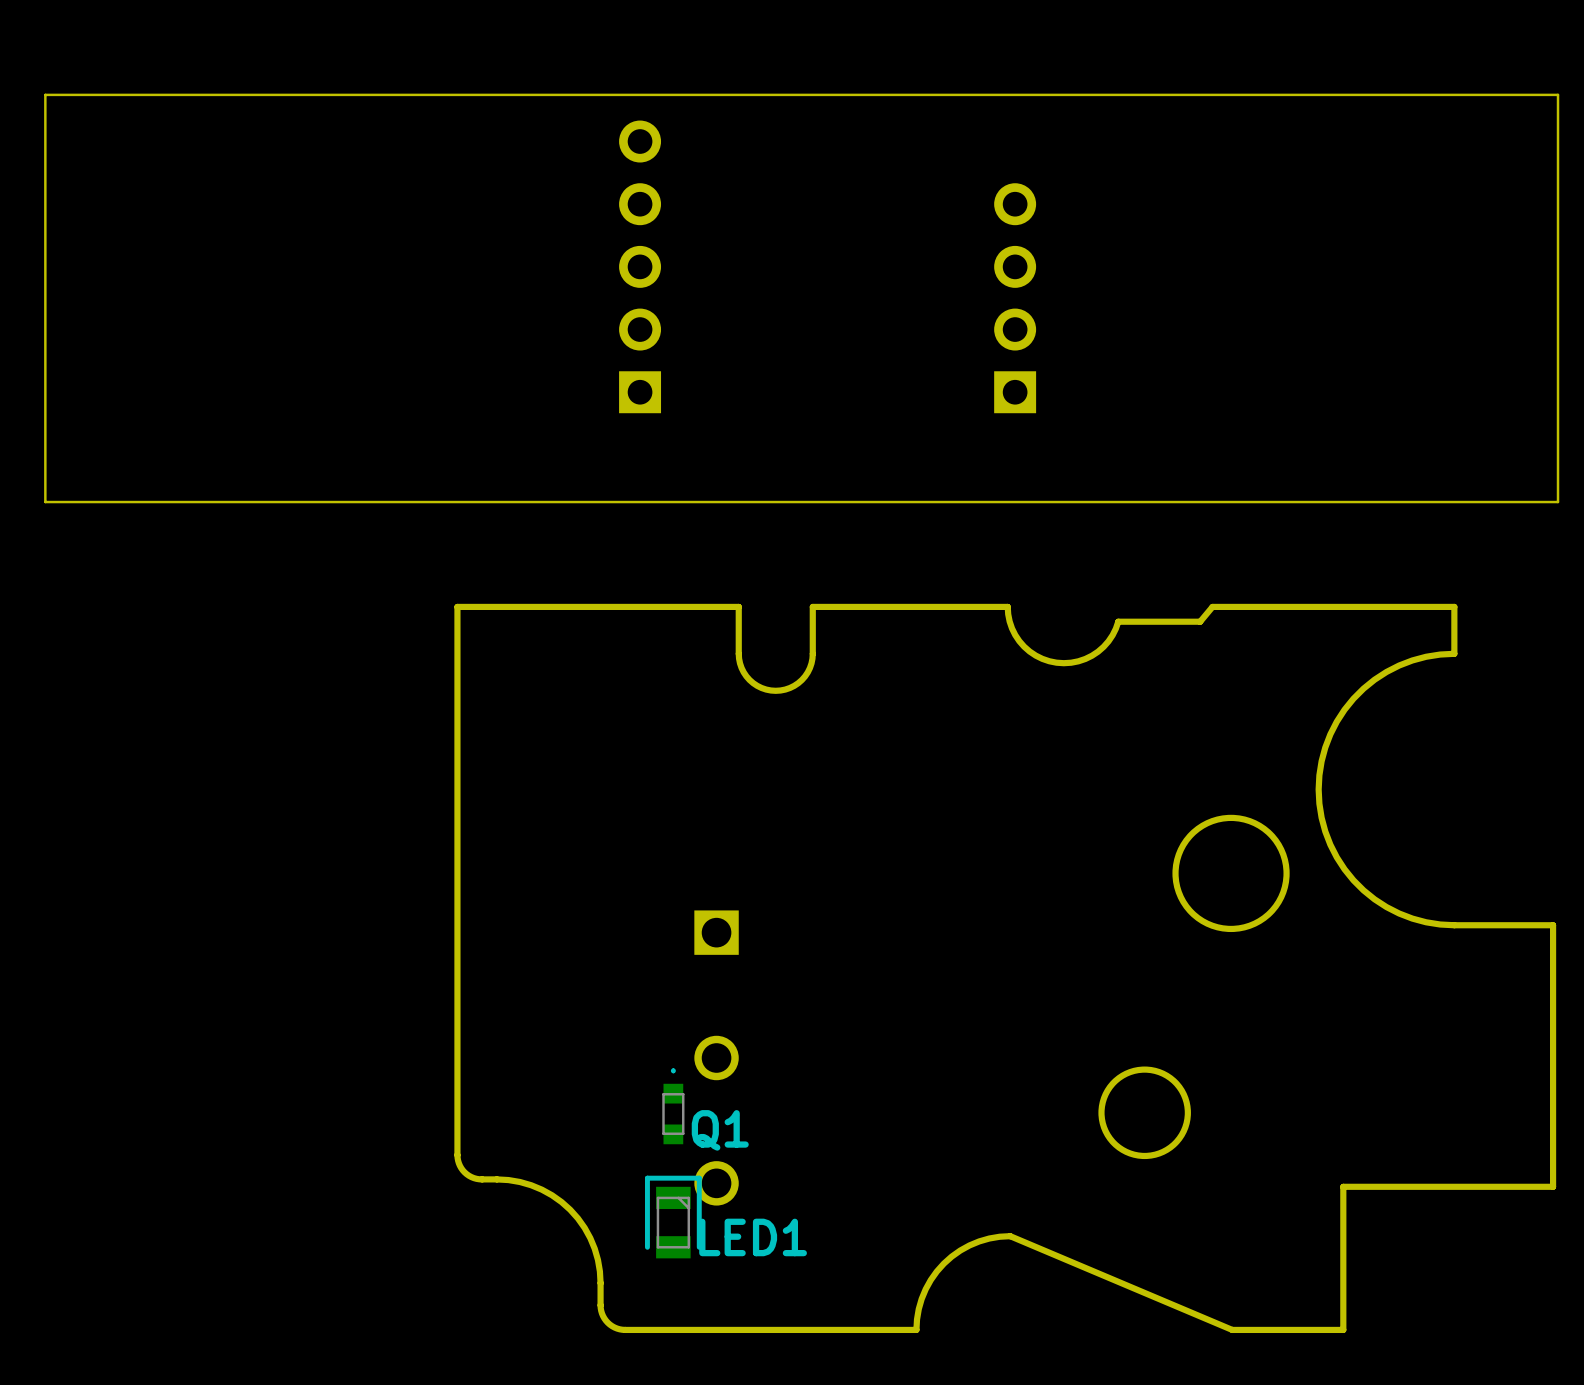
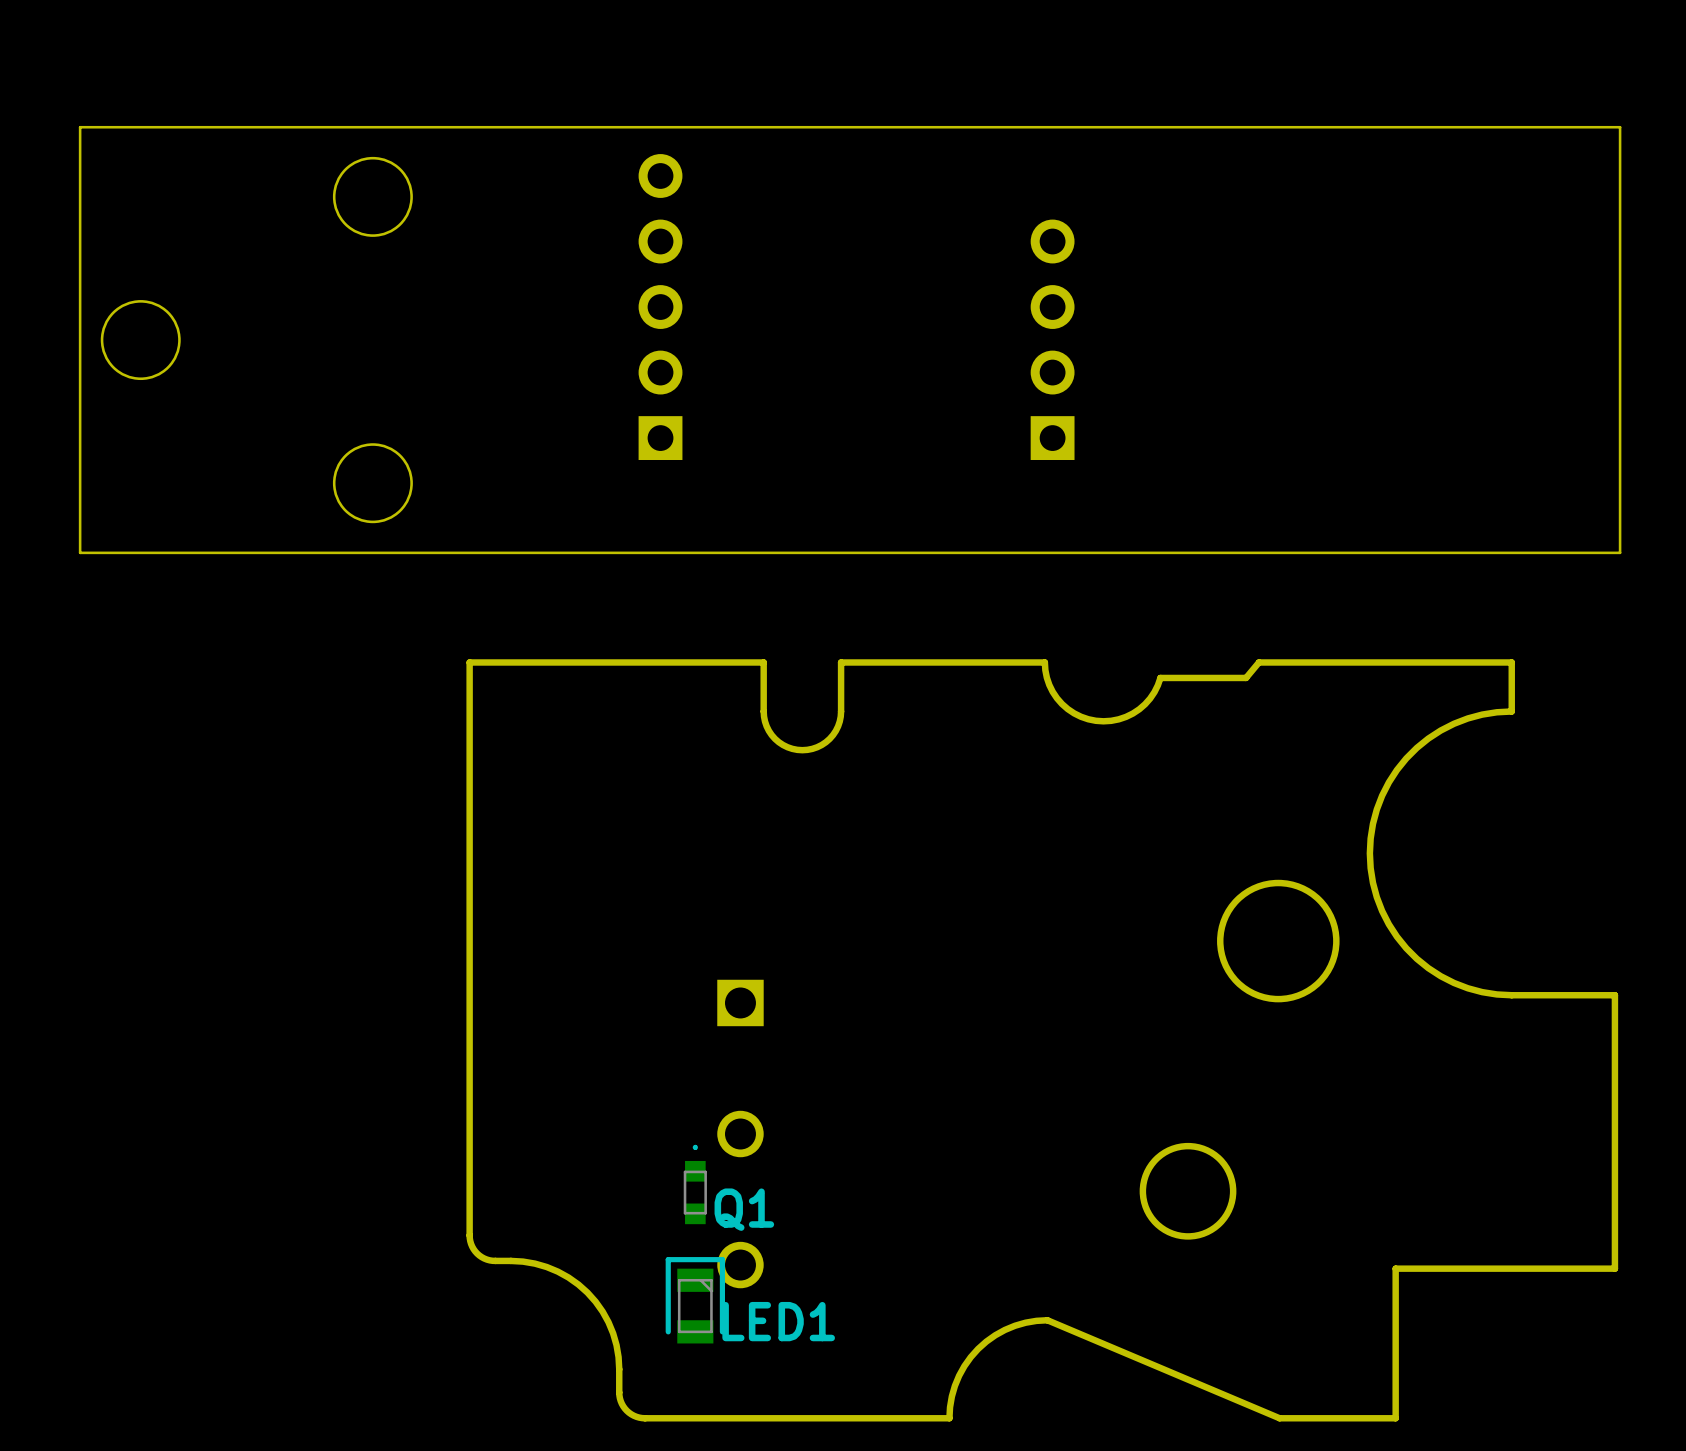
board edge: (84, 94) (45, 94) (45, 502) (84, 502) -> (80, 127) (80, 552)
round board edge: none -> [332, 156, 413, 237]
round board edge: none -> [100, 300, 181, 381]
round board edge: none -> [332, 443, 413, 524]

